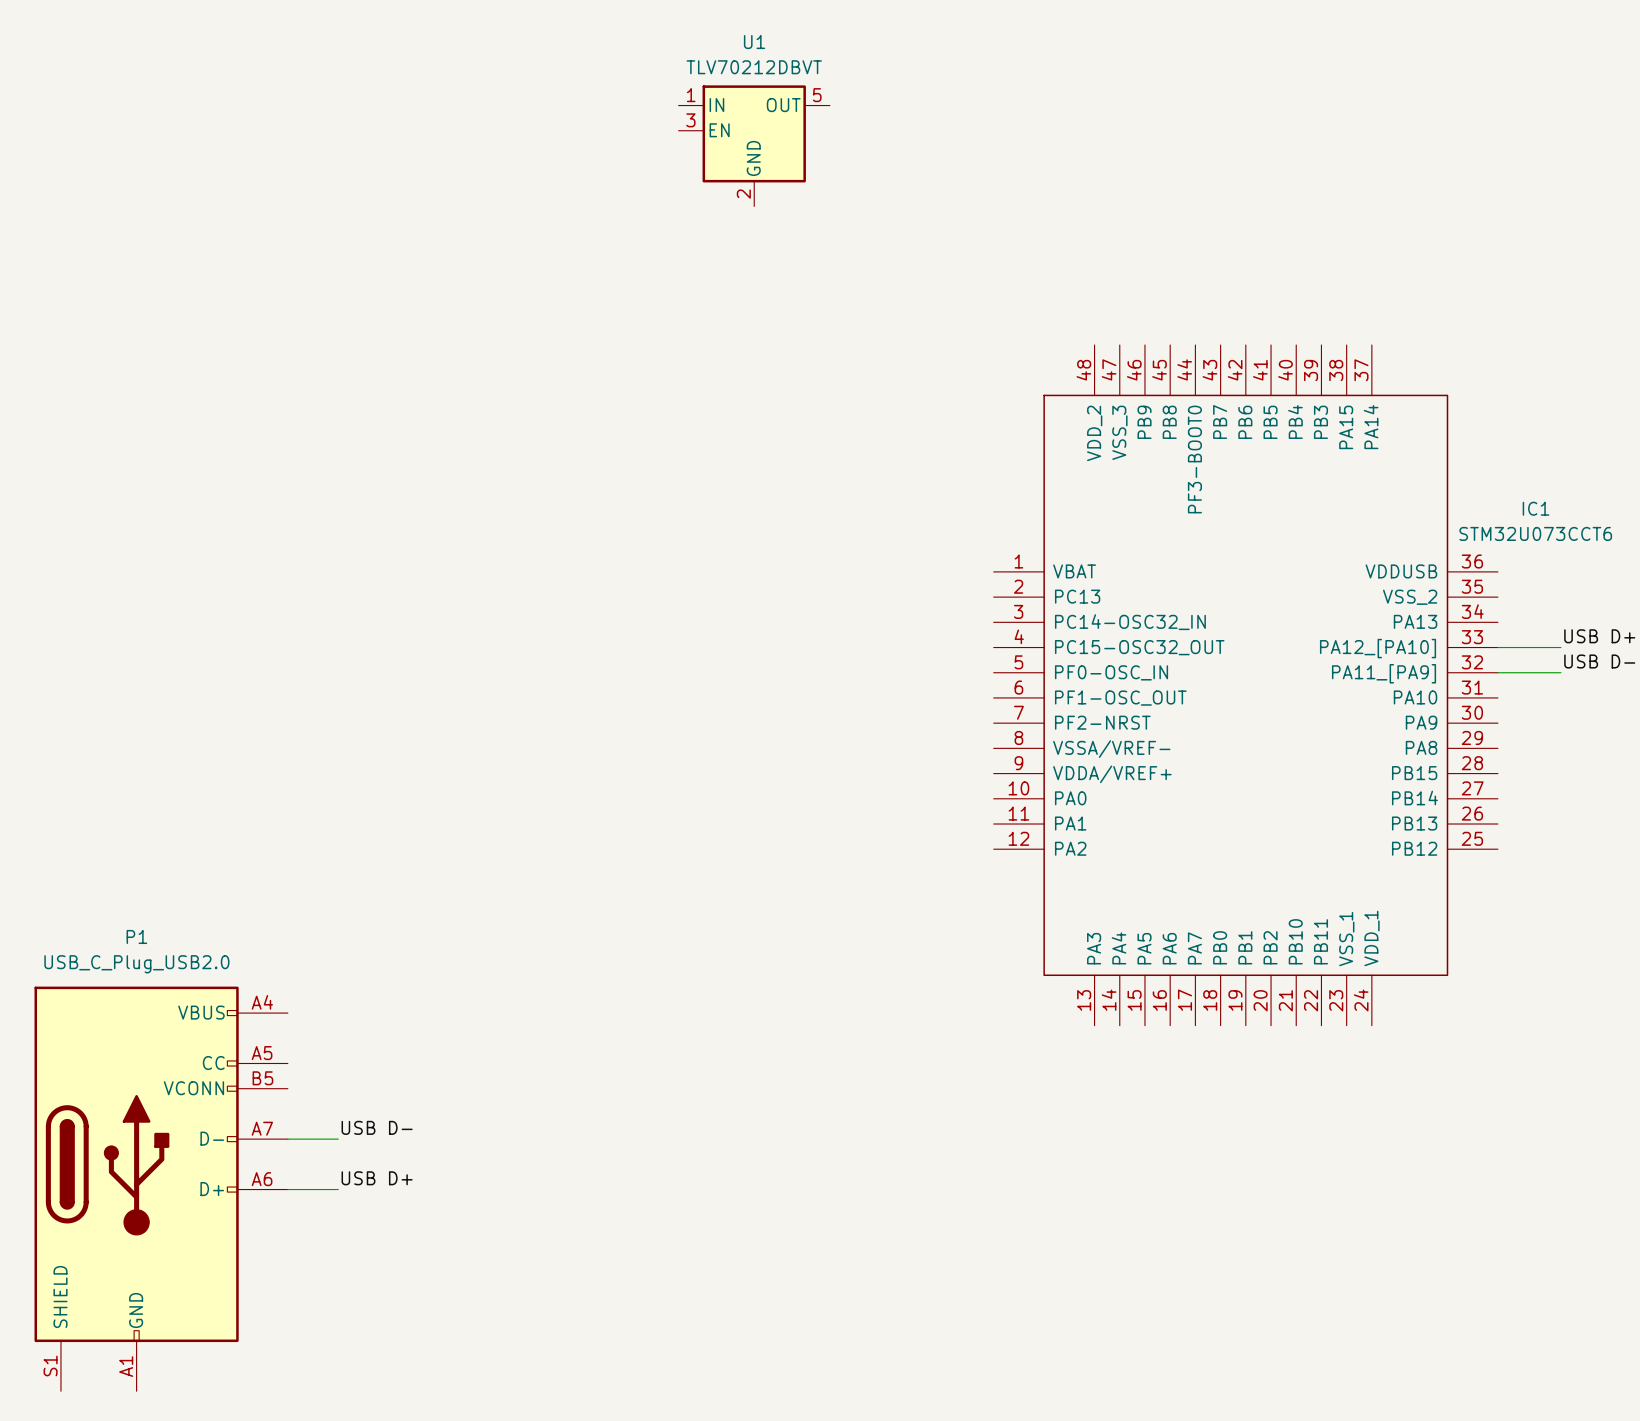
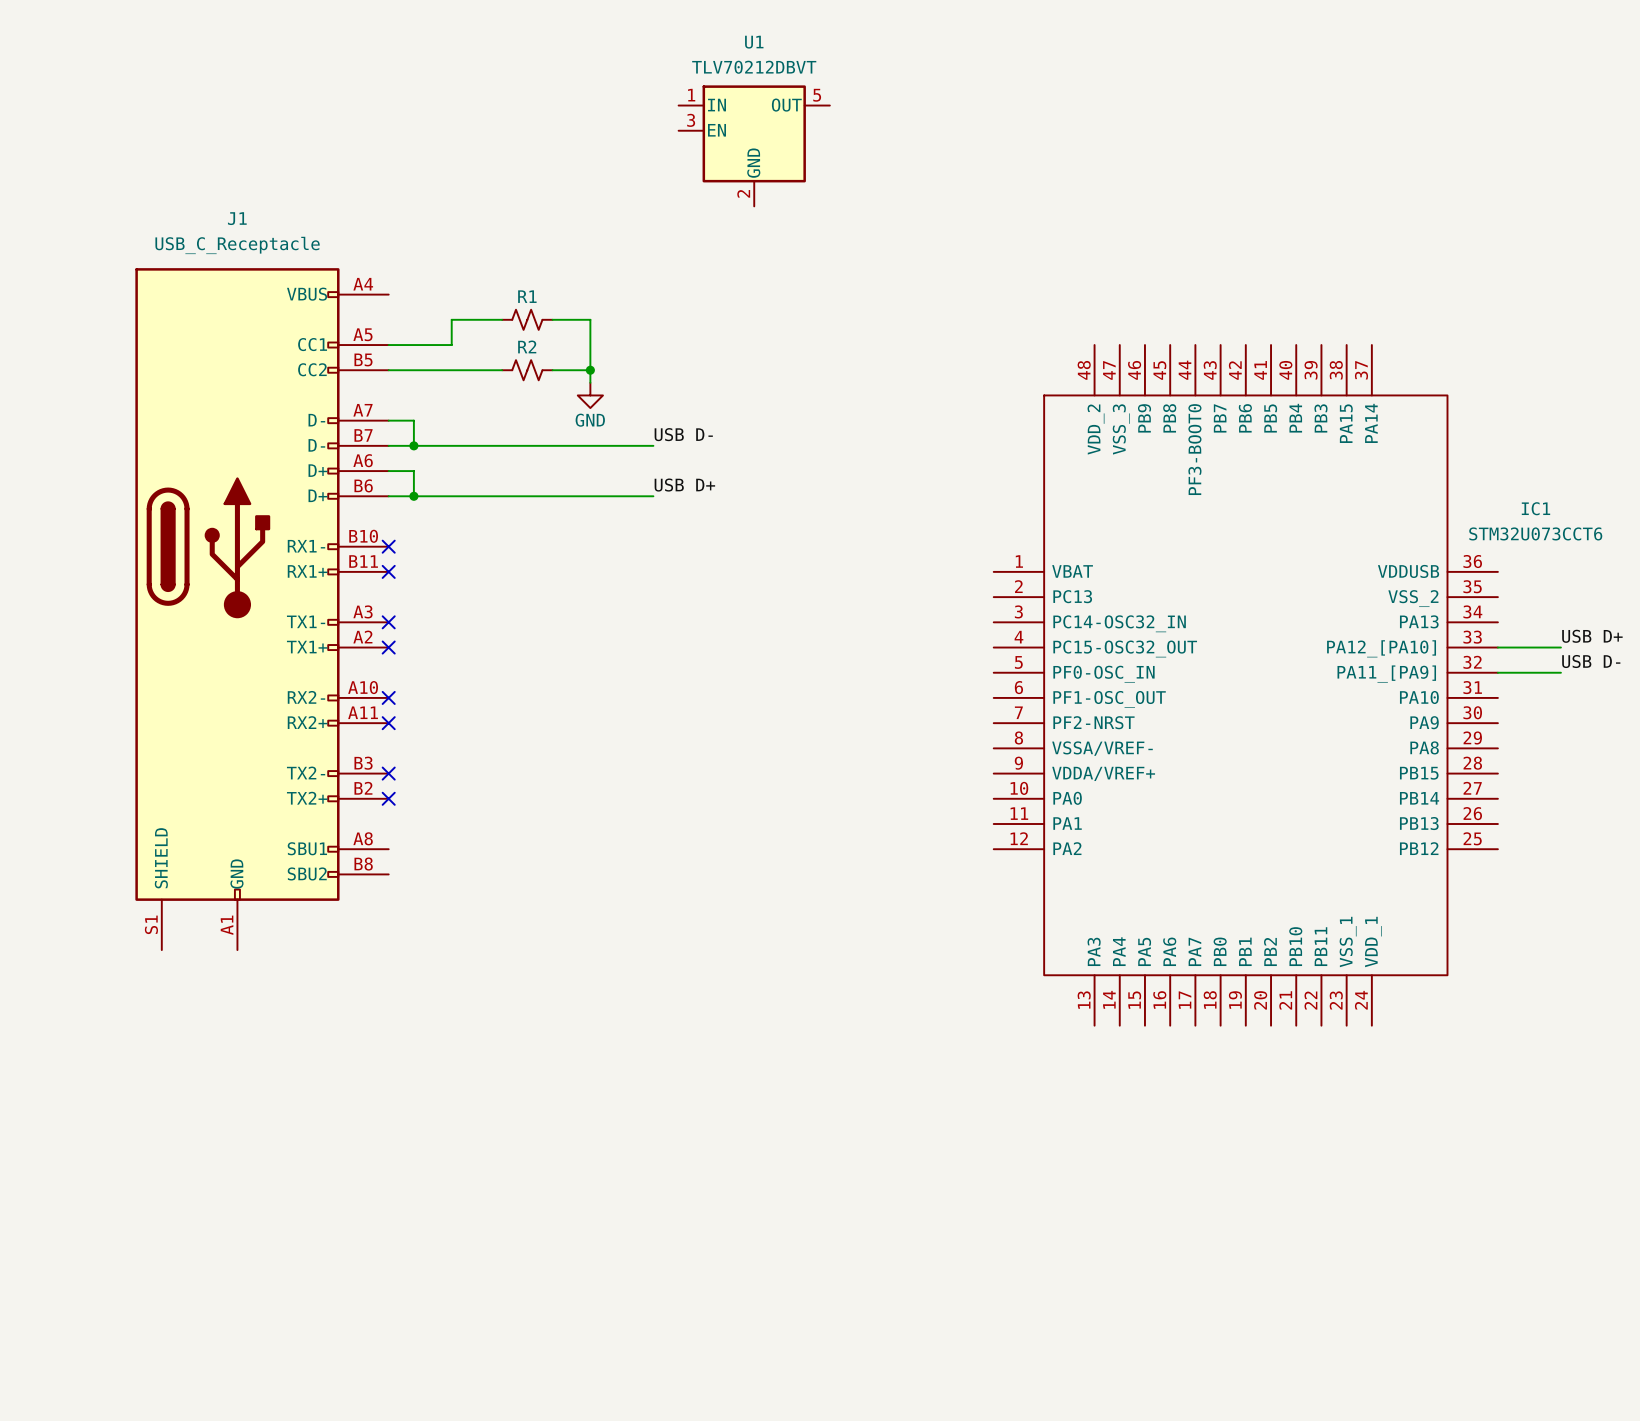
wire: none -> (502, 319) (451, 319) (451, 345) (388, 345)
R1: none -> (527, 319)
wire: none -> (552, 319) (590, 319) (590, 382)
wire: none -> (388, 370) (502, 370)
R2: none -> (527, 370)
wire: none -> (552, 370) (590, 370)
junction: none -> (590, 370)
power symbol: none -> GND (590, 395)
wire: none -> (388, 420) (413, 420) (413, 445)
label: none -> USB D- (683, 434)
wire: none -> (388, 445) (653, 445)
junction: none -> (413, 445)
wire: none -> (388, 471) (413, 471) (413, 496)
label: none -> USB D+ (684, 485)
wire: none -> (388, 496) (653, 496)
junction: none -> (413, 496)
no-connect mark: none -> (388, 546)
no-connect mark: none -> (388, 571)
J1: none -> USB_C_Receptacle (262, 609)
no-connect mark: none -> (388, 622)
no-connect mark: none -> (388, 647)
no-connect mark: none -> (388, 697)
no-connect mark: none -> (388, 723)
no-connect mark: none -> (388, 773)
no-connect mark: none -> (388, 798)
label: USB D- (377, 1127) -> none
wire: (287, 1139) (338, 1139) -> none
label: USB D+ (377, 1178) -> none
P1: USB_C_Plug_USB2.0 (161, 1188) -> none
wire: (287, 1189) (338, 1189) -> none

